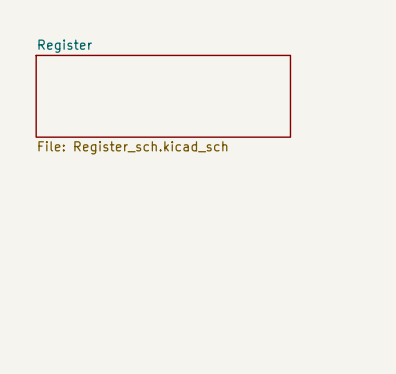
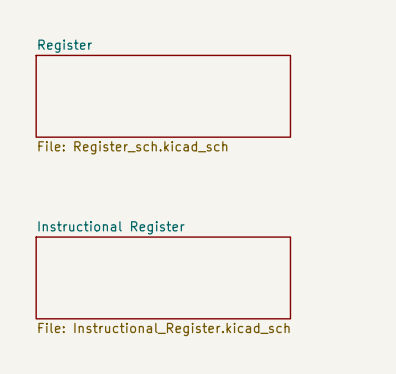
sheet Instructional Register: none -> File: Instructional_Register.kicad_sch (163, 277)

